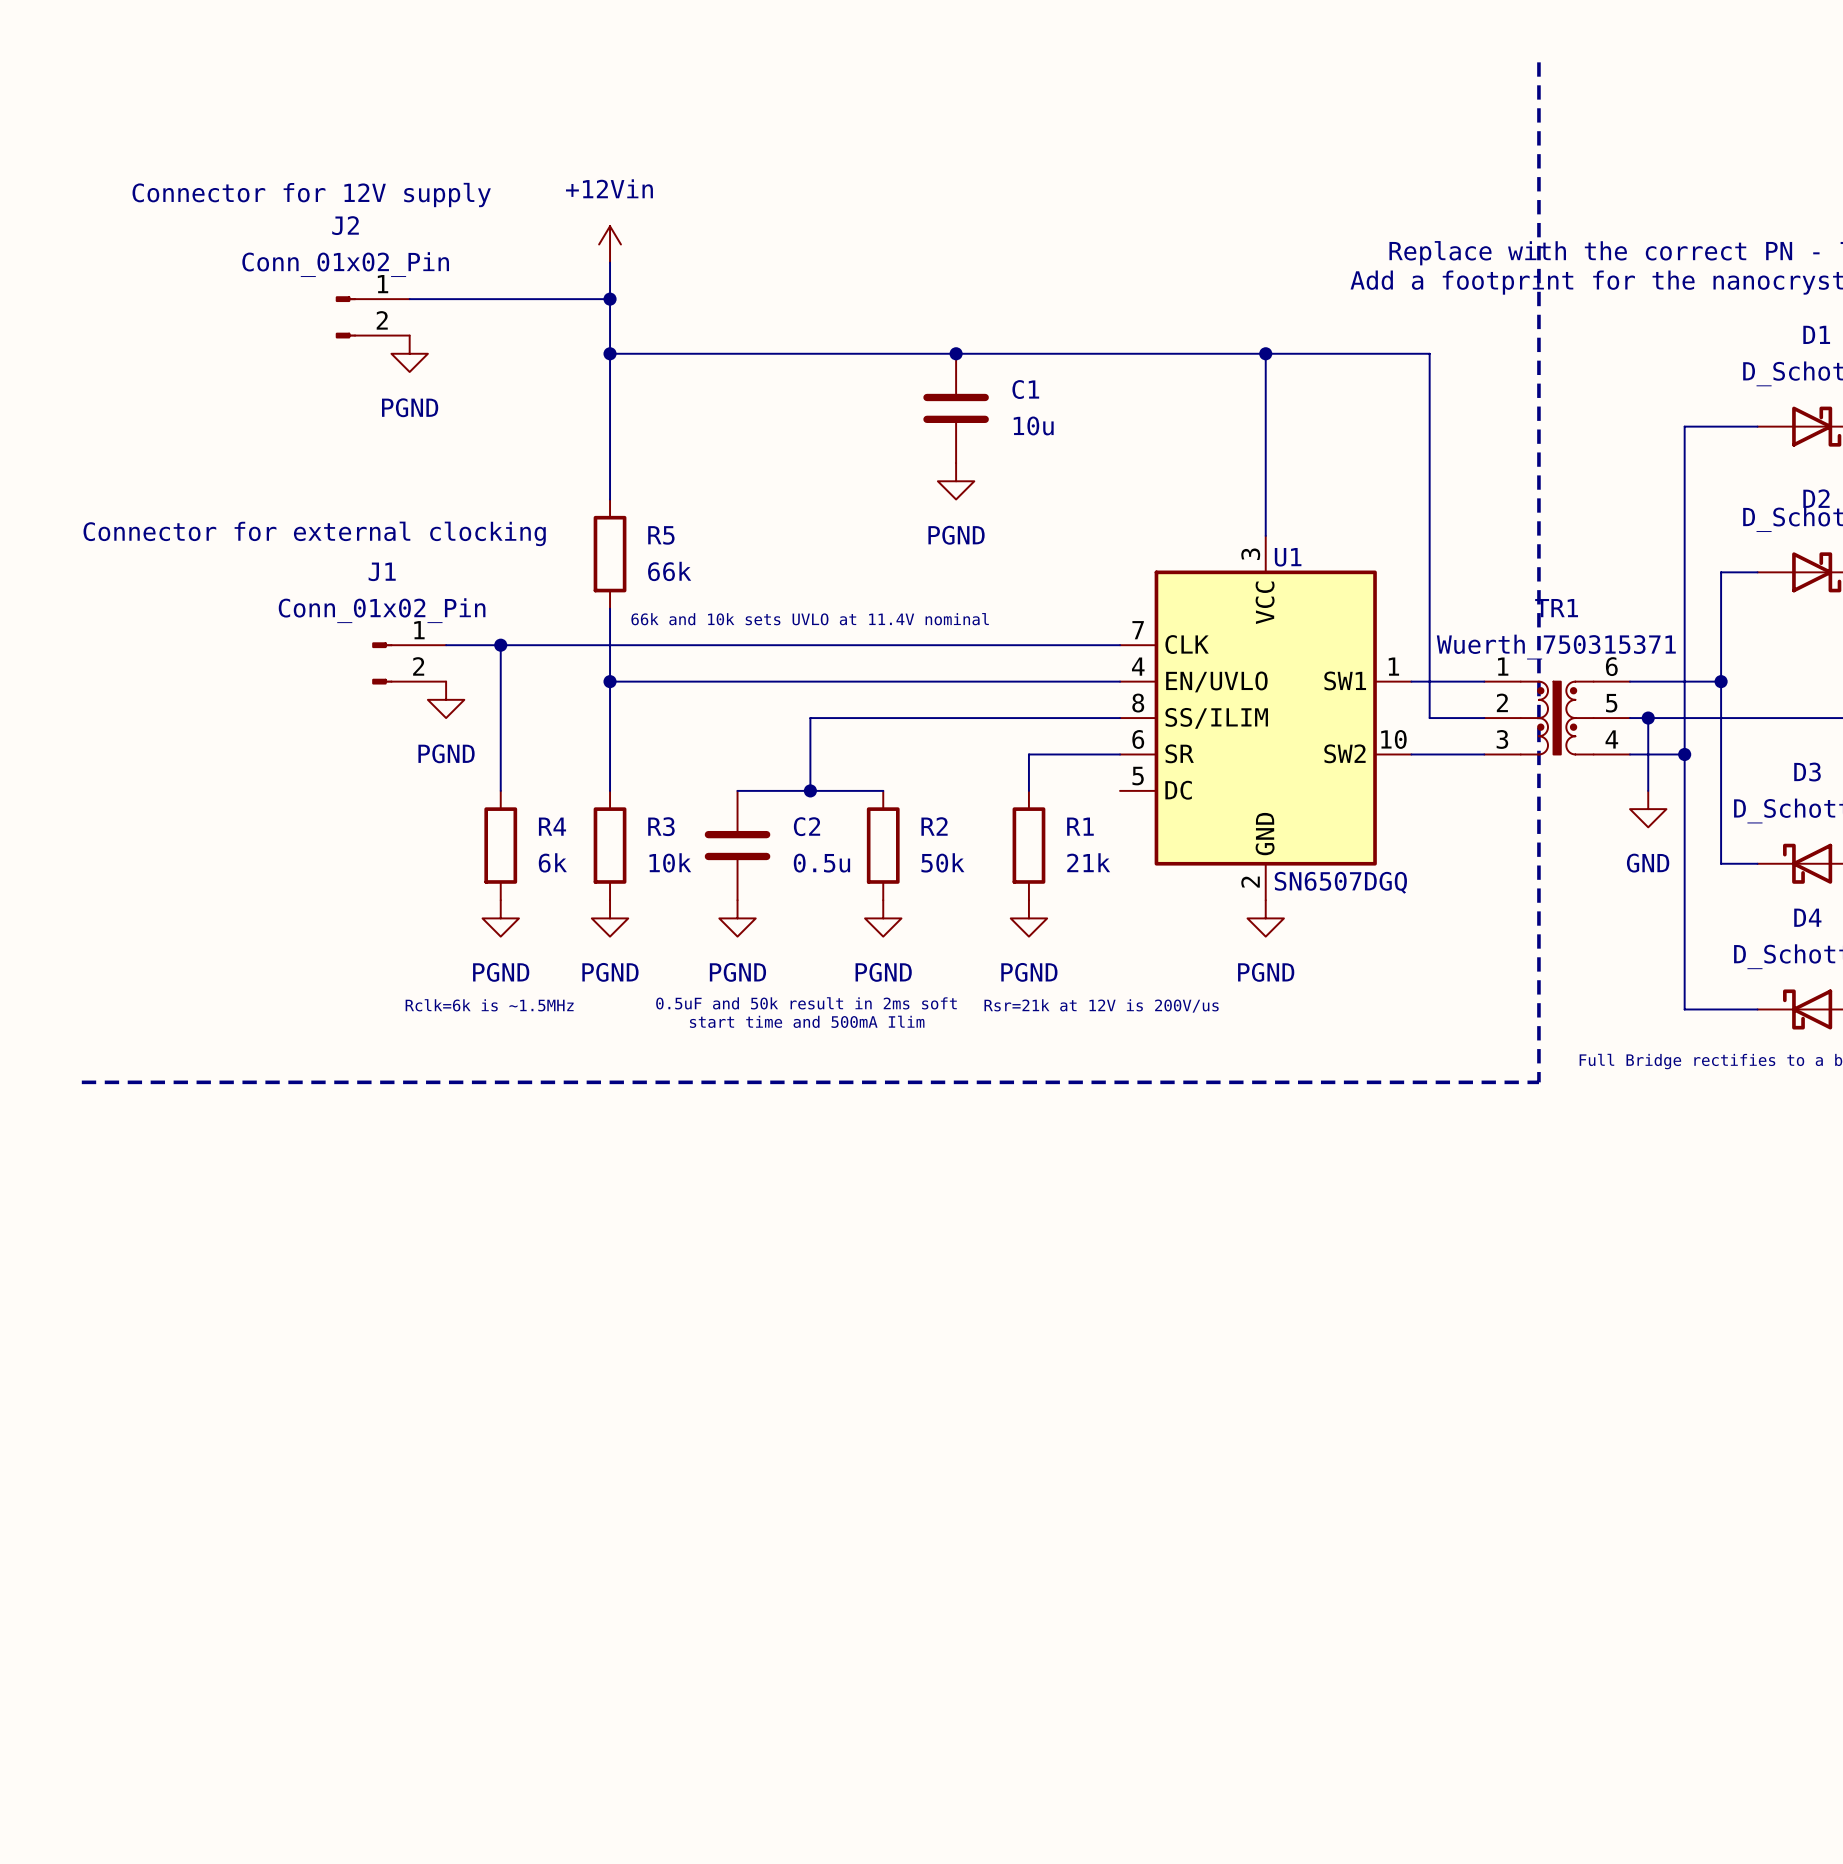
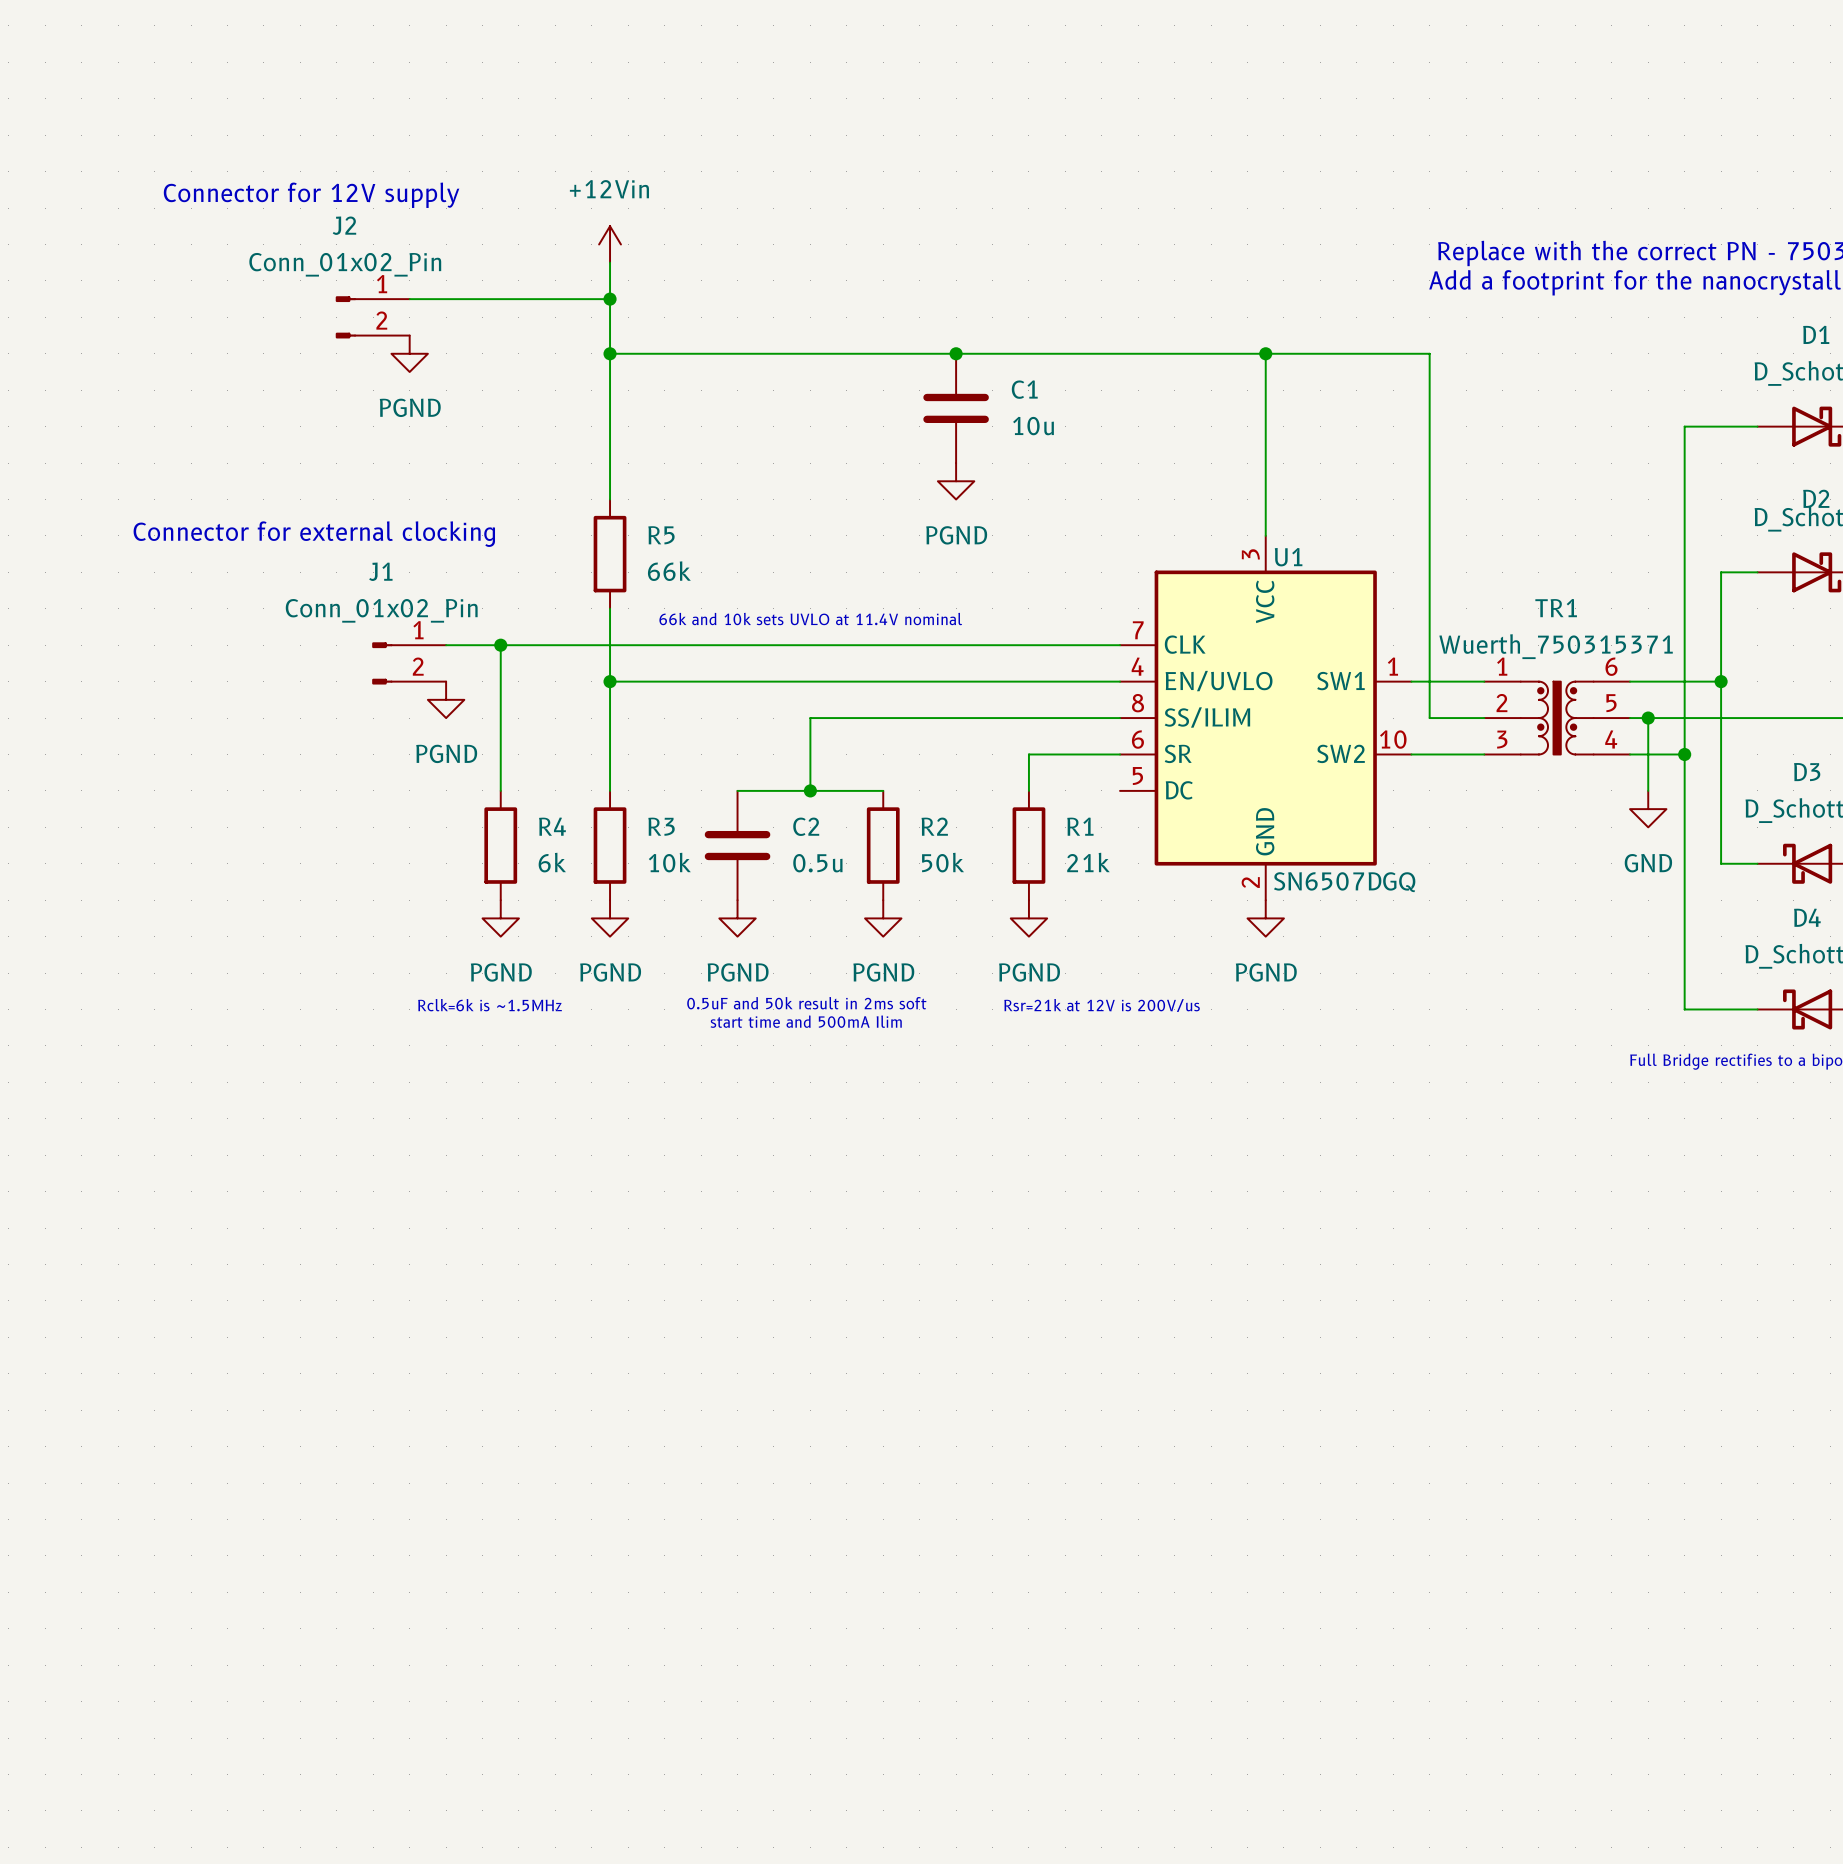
line: (1538, 62) (1538, 1082) (81, 1082) -> none

